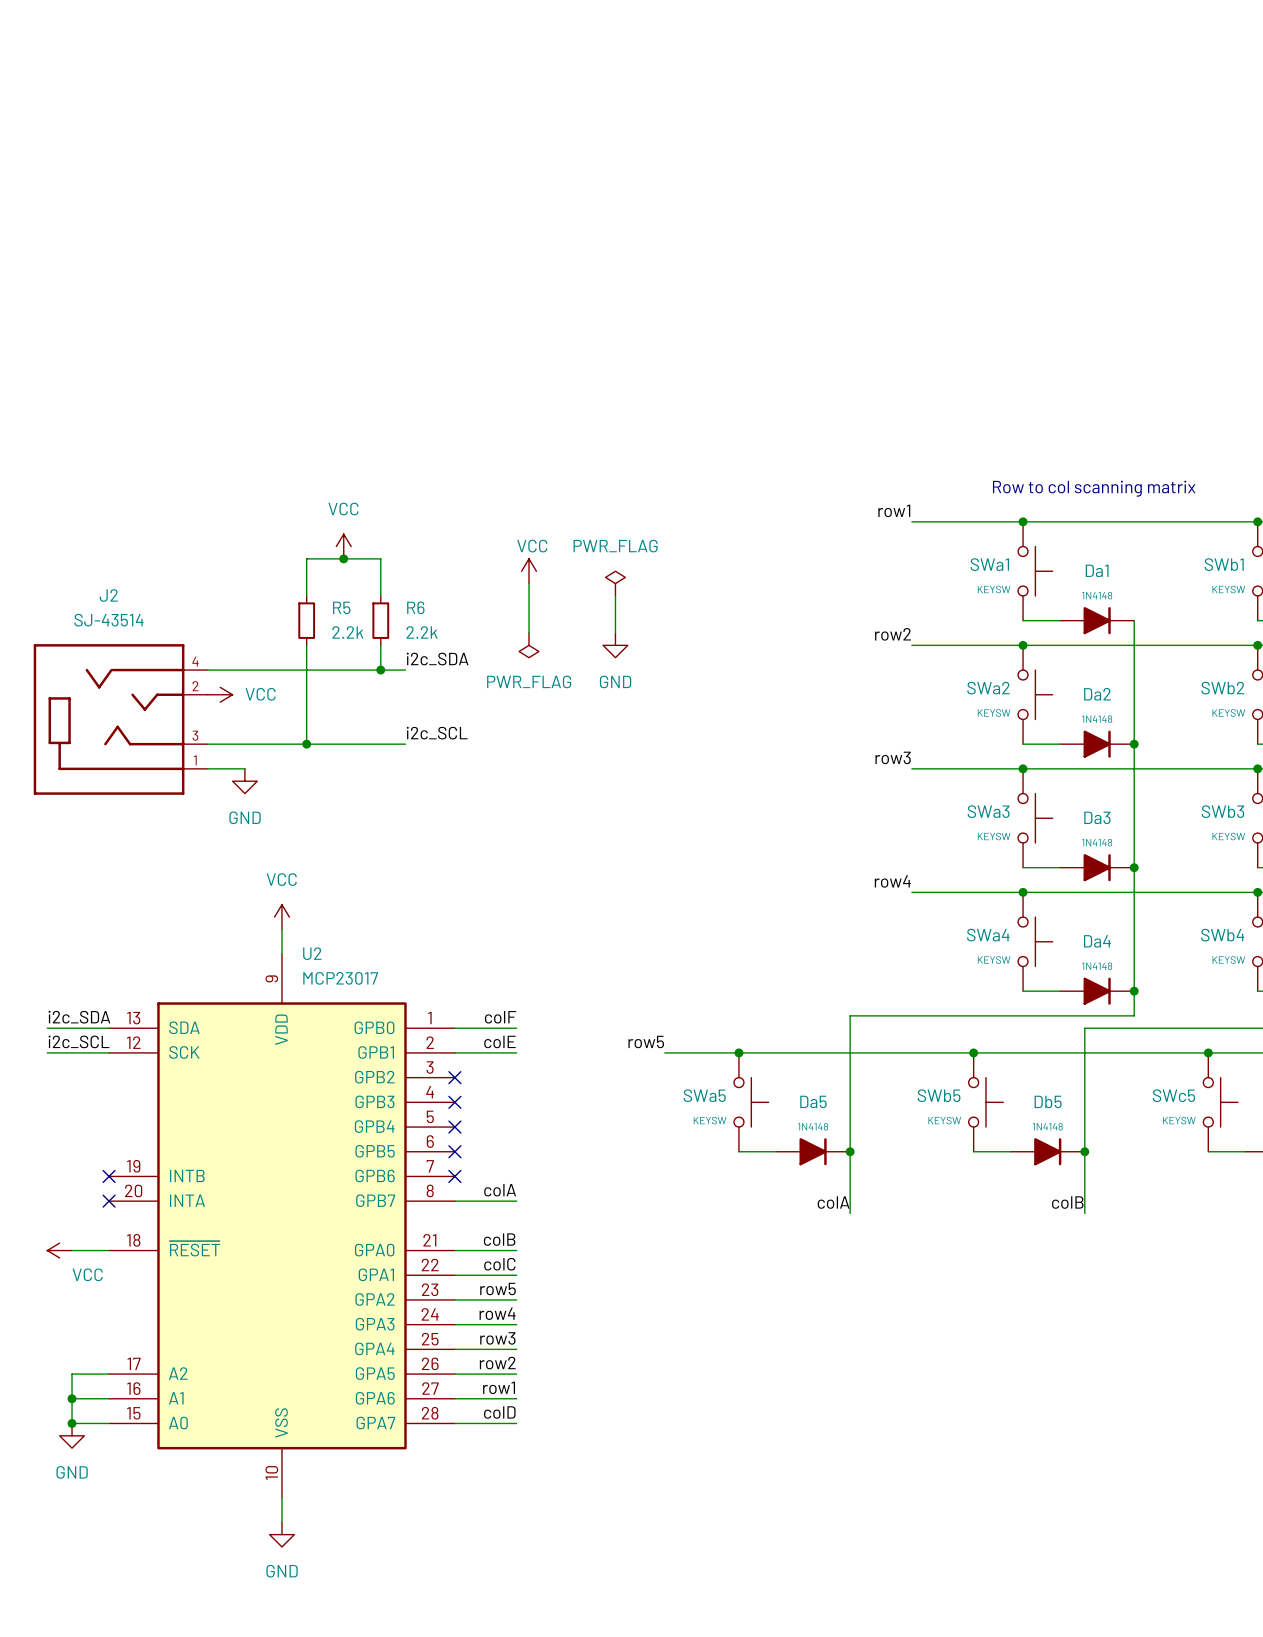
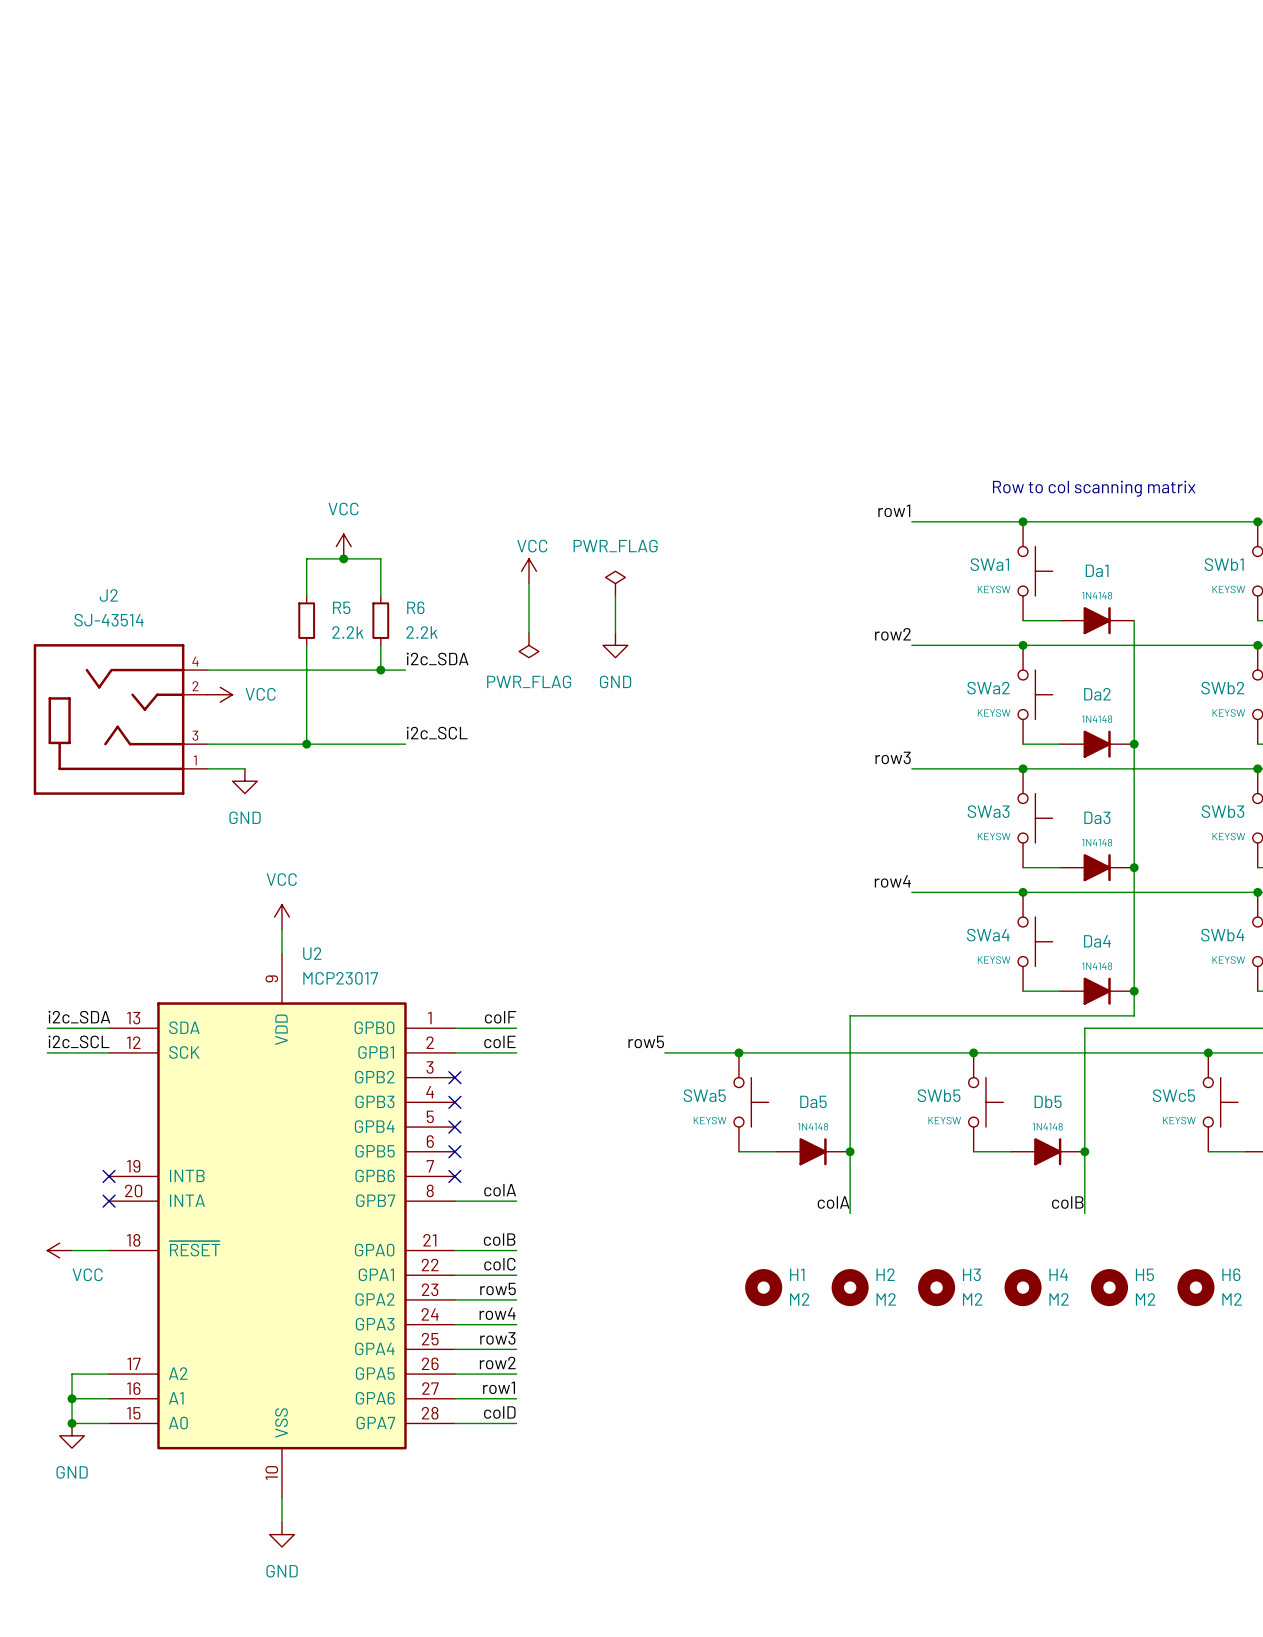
H1: none -> M2 (763, 1287)
H2: none -> M2 (850, 1287)
H3: none -> M2 (936, 1287)
H4: none -> M2 (1023, 1287)
H5: none -> M2 (1109, 1287)
H6: none -> M2 (1195, 1287)

